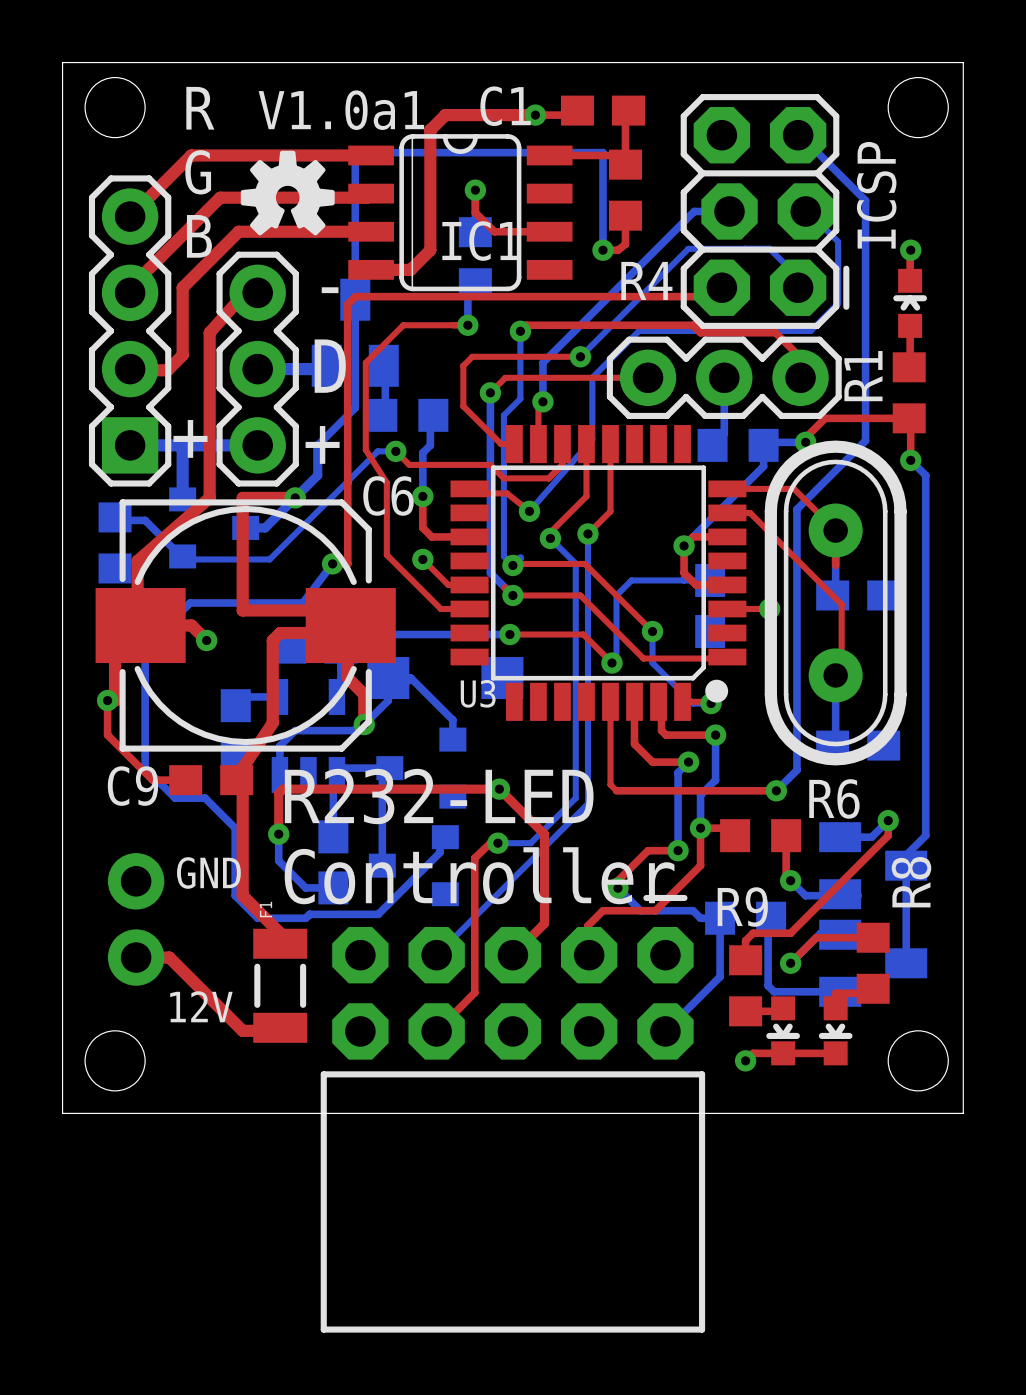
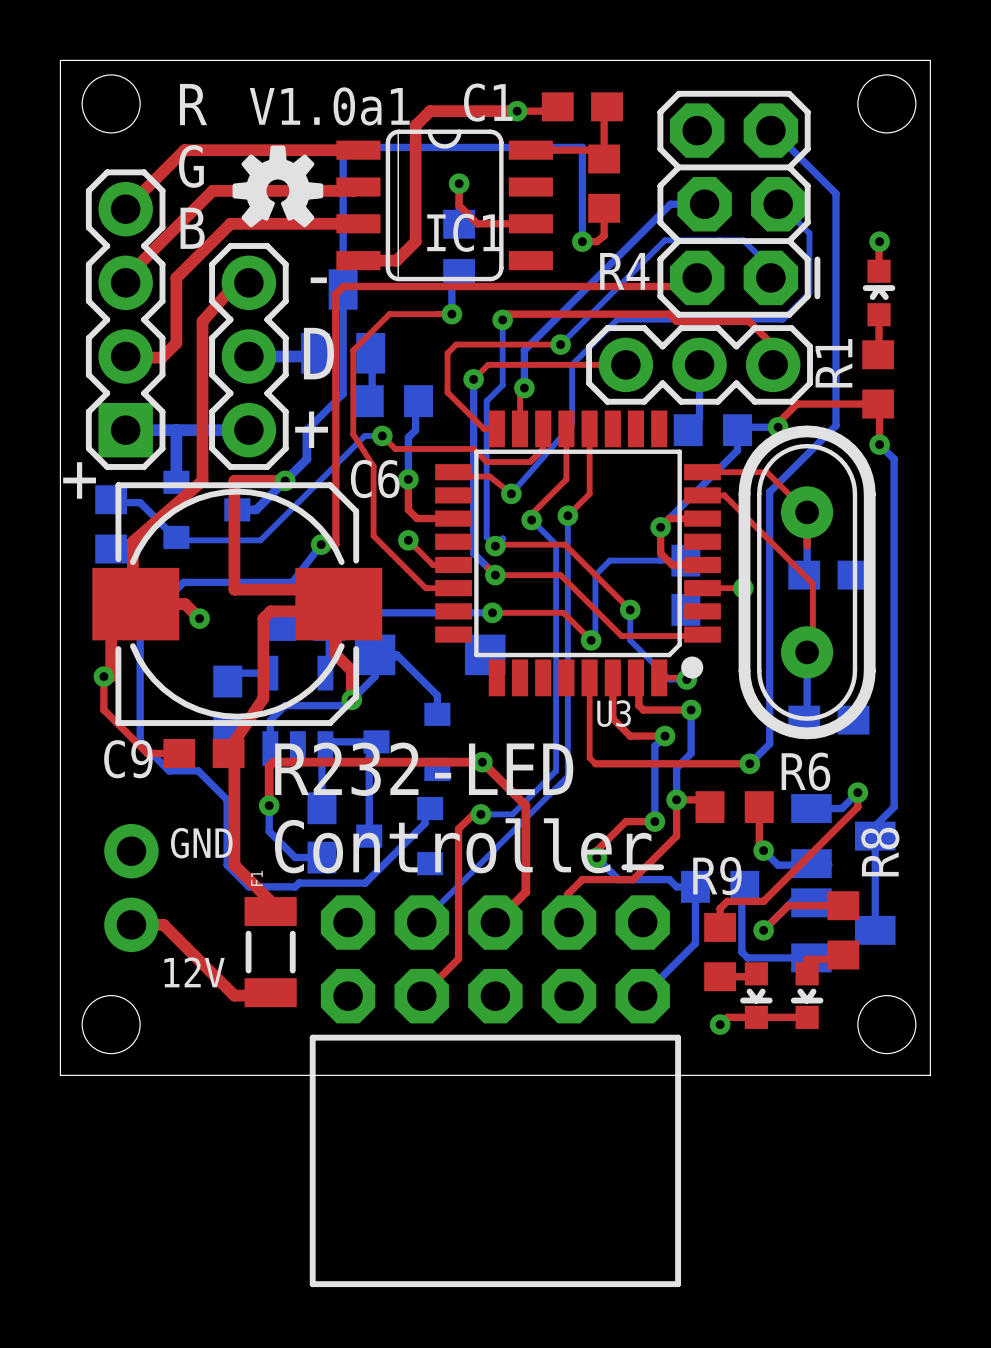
text: ICSP (876, 195) -> none
text position: + (190, 438) -> + (79, 480)
U3 name position: U3 (478, 693) -> U3 (614, 713)

